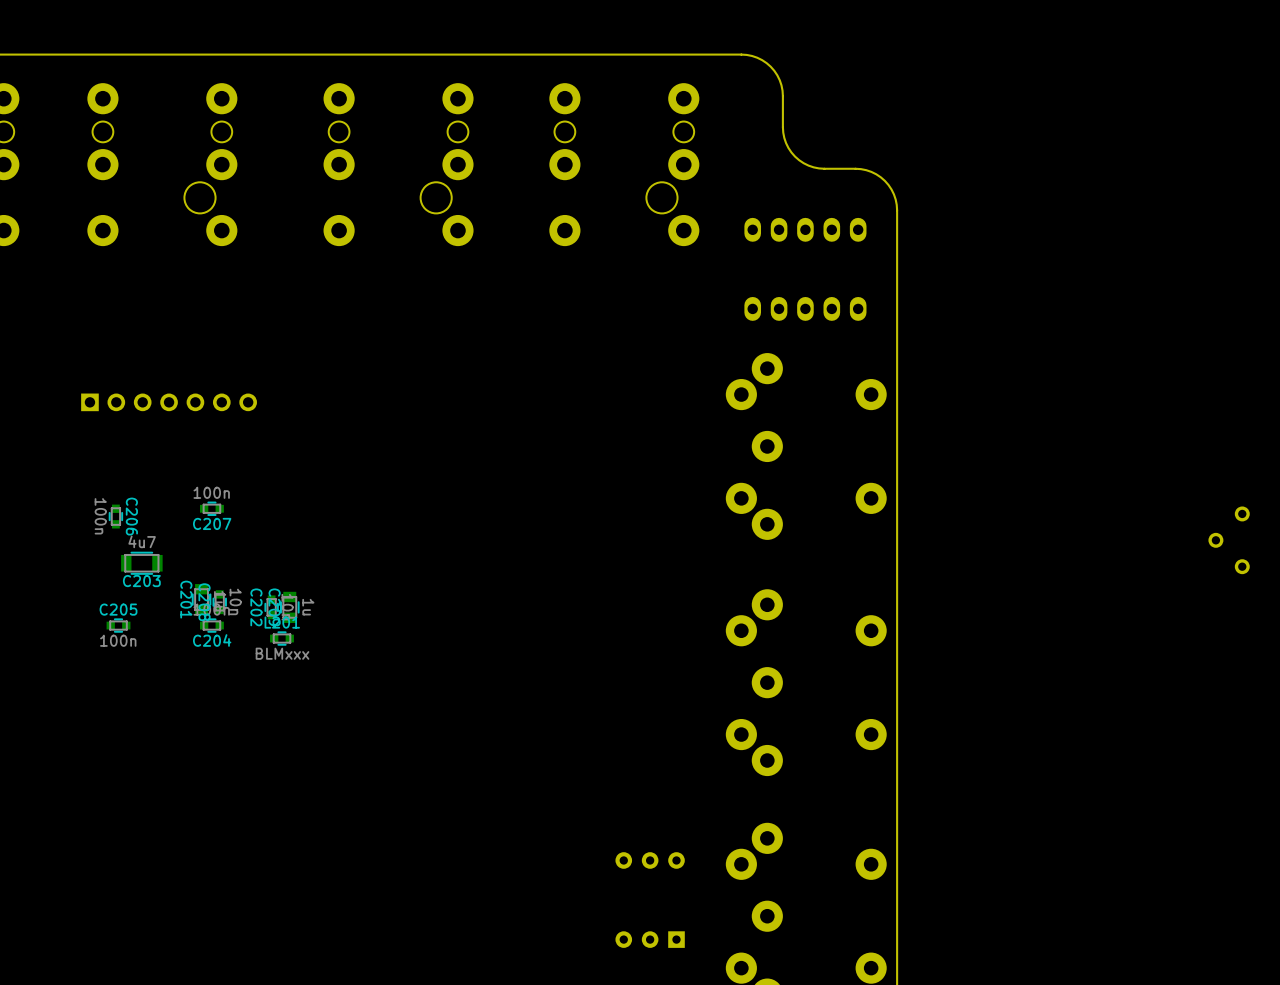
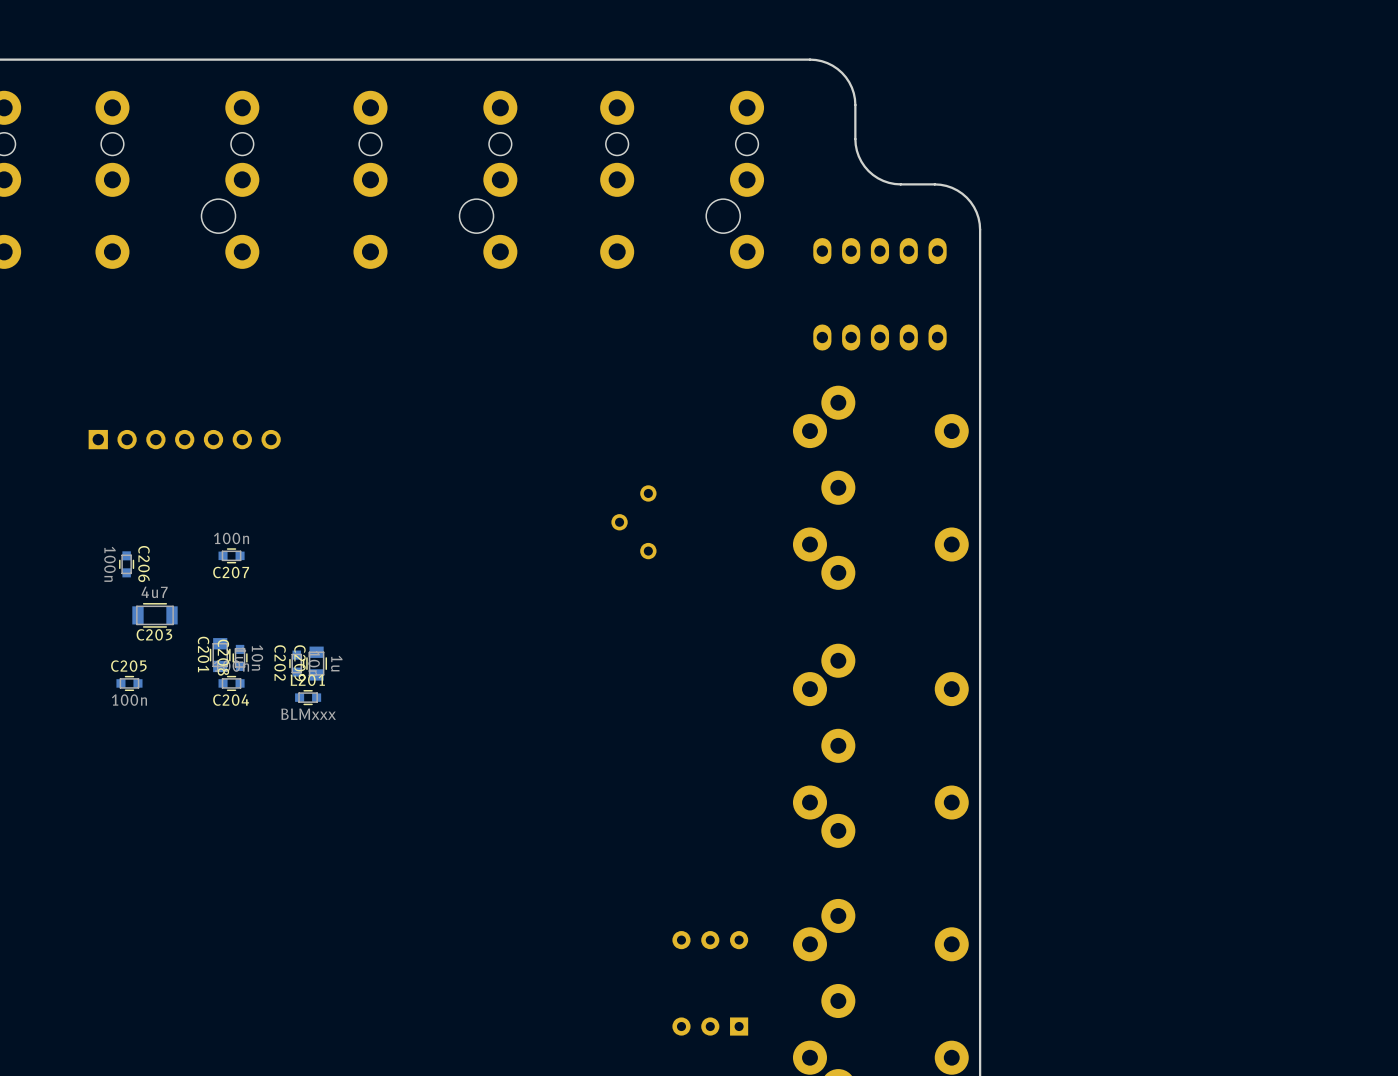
part: none -> (633, 522)
part: (1229, 540) -> none

